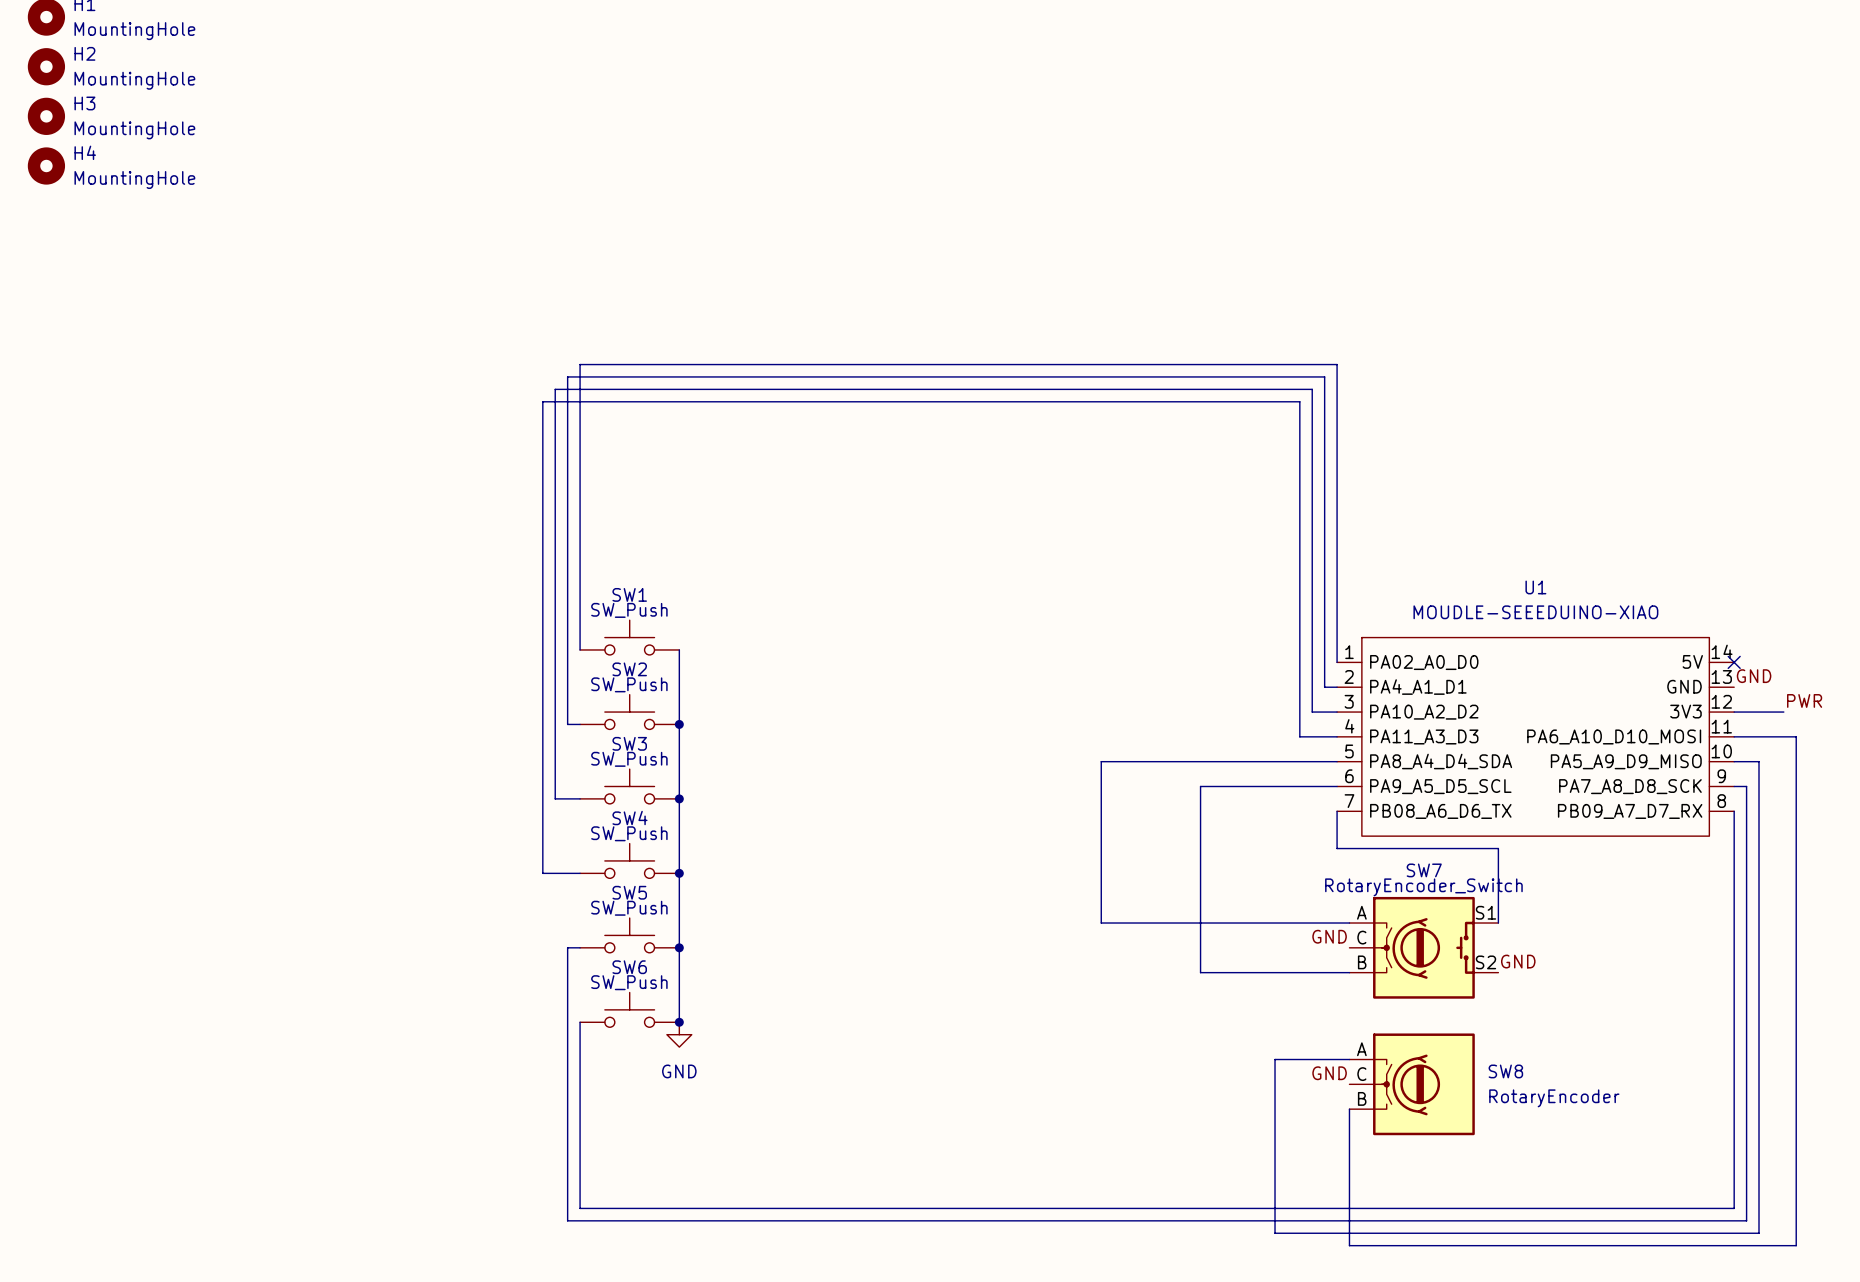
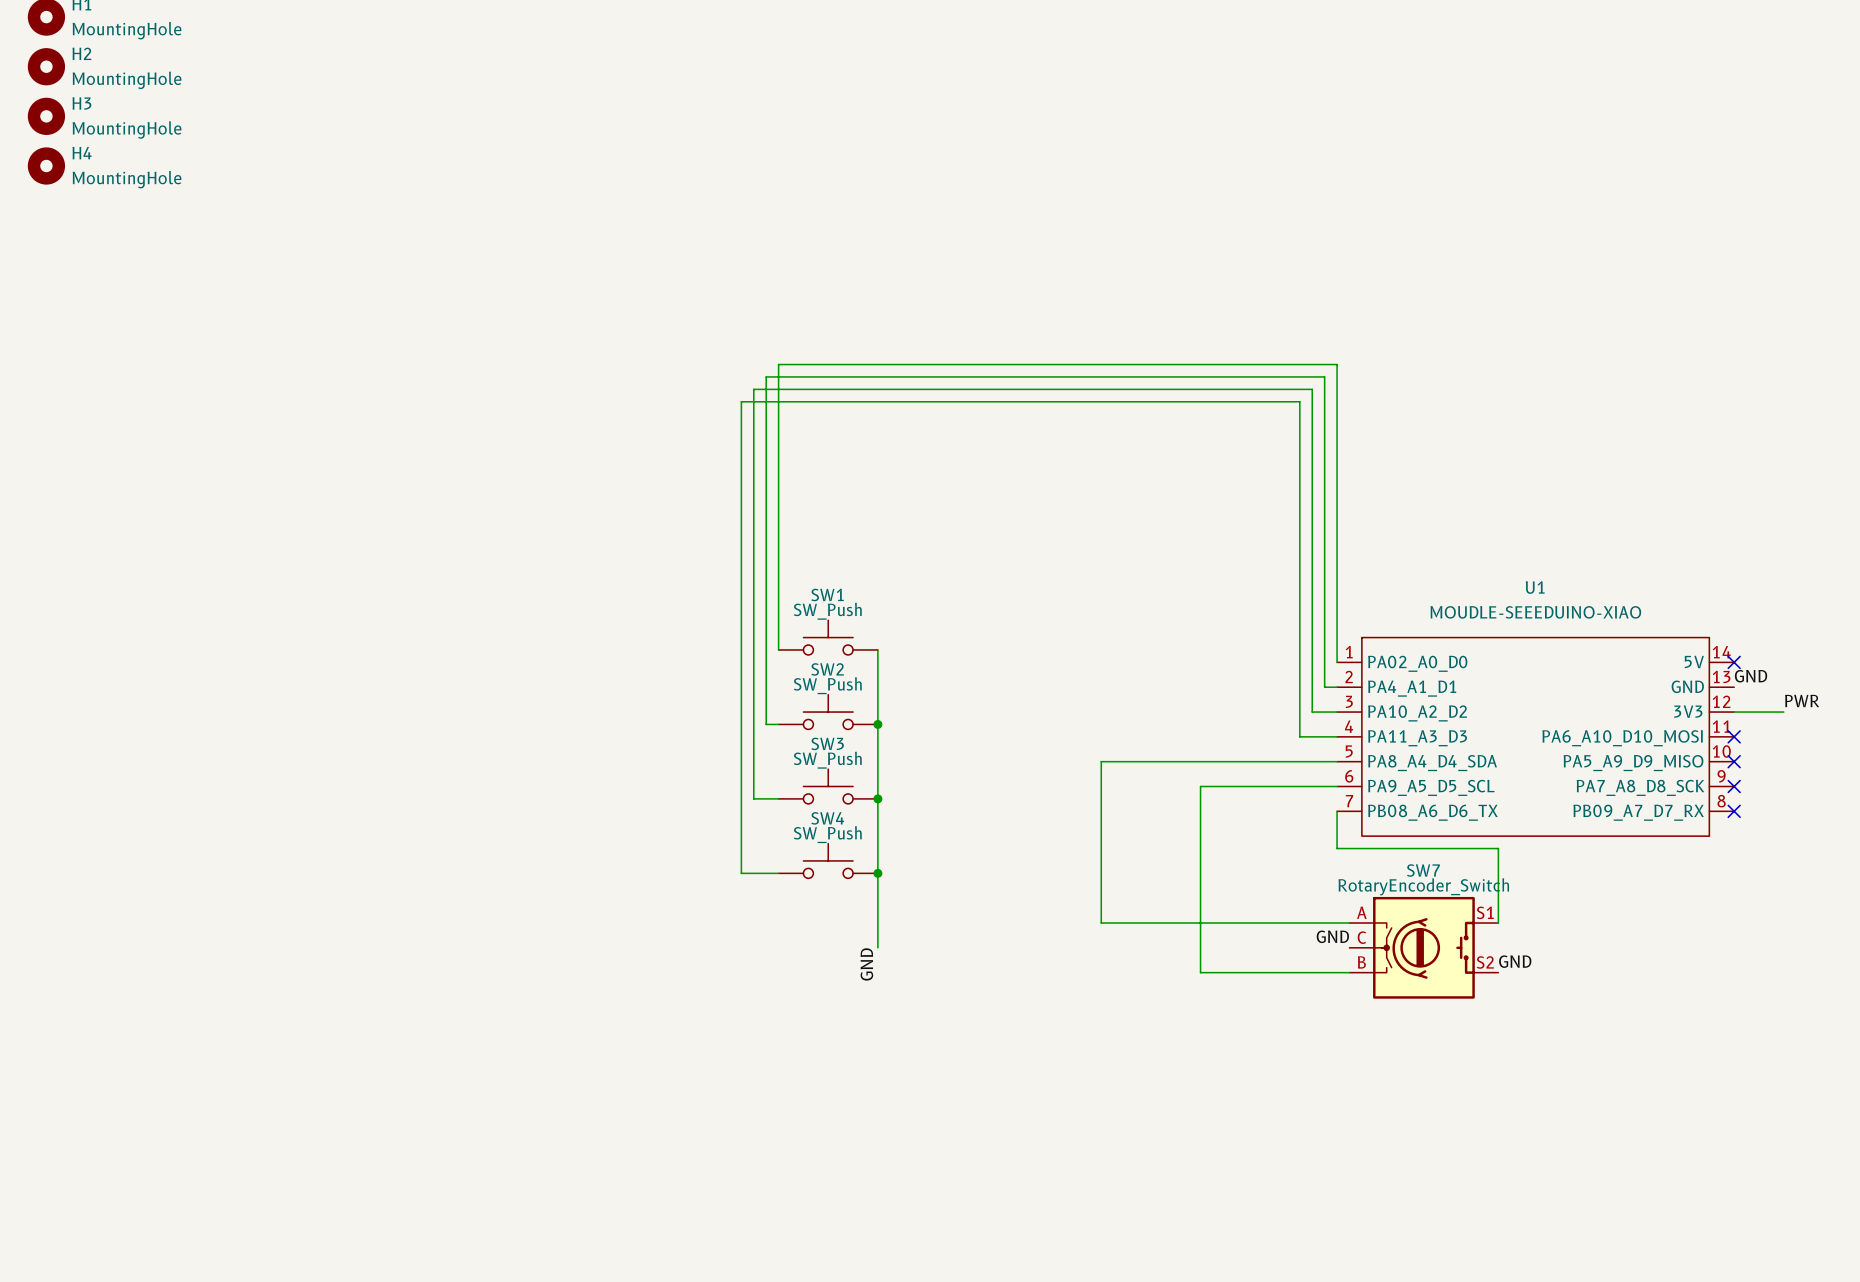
wire: (778, 364) (580, 364) (580, 649) -> (778, 364) (778, 649)
wire: (766, 376) (567, 376) (567, 724) (580, 724) -> (766, 376) (766, 724) (778, 724)
wire: (753, 389) (555, 389) (555, 798) (580, 798) -> (753, 389) (753, 798) (778, 798)
wire: (741, 401) (542, 401) (542, 873) (580, 873) -> (741, 401) (741, 873) (778, 873)
SW1 position: (629, 637) -> (828, 637)
wire: (679, 649) (679, 1022) -> none
wire: none -> (877, 649) (877, 947)
SW2 position: (629, 712) -> (828, 712)
junction: (679, 724) -> none
junction: none -> (877, 724)
wire: (1734, 736) (1796, 736) (1796, 1245) (1349, 1245) (1349, 1109) -> none
no-connect mark: none -> (1734, 736)
wire: (1734, 761) (1759, 761) (1759, 1233) (1275, 1233) (1275, 1059) (1349, 1059) -> none
no-connect mark: none -> (1734, 761)
SW3 position: (629, 786) -> (828, 786)
wire: (1734, 786) (1746, 786) (1746, 1220) (567, 1220) (567, 947) (580, 947) -> none
no-connect mark: none -> (1734, 786)
junction: (679, 798) -> none
junction: none -> (877, 798)
wire: (1734, 811) (1734, 1208) (580, 1208) (580, 1022) -> none
no-connect mark: none -> (1734, 811)
SW4 position: (629, 860) -> (828, 860)
junction: (679, 873) -> none
junction: none -> (877, 873)
SW5: SW_Push (629, 935) -> none
junction: (679, 947) -> none
label: none -> GND (866, 964)
SW6: SW_Push (629, 1009) -> none
junction: (679, 1022) -> none
power symbol: GND (679, 1034) -> none
label: GND (1329, 1073) -> none
SW8: RotaryEncoder (1412, 1084) -> none

